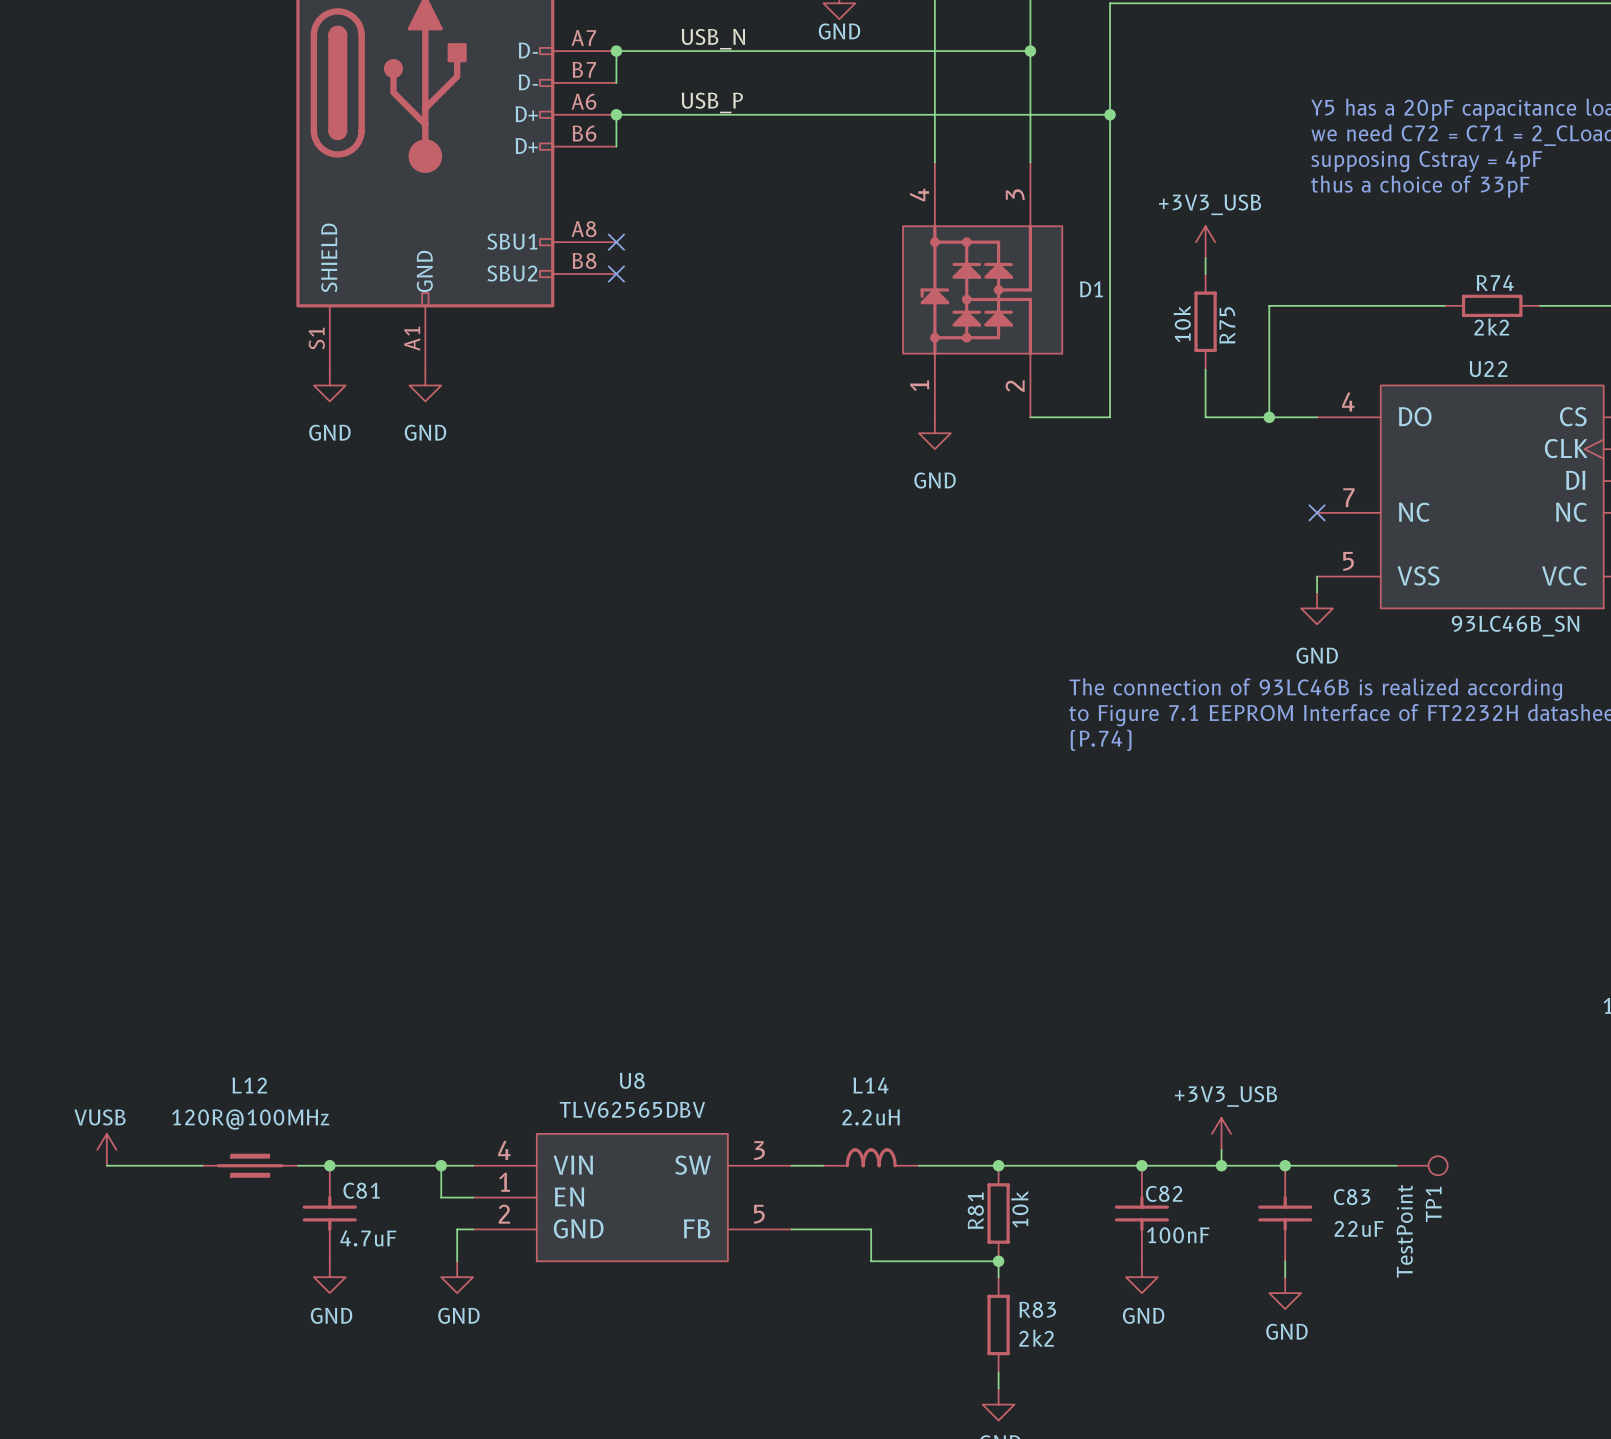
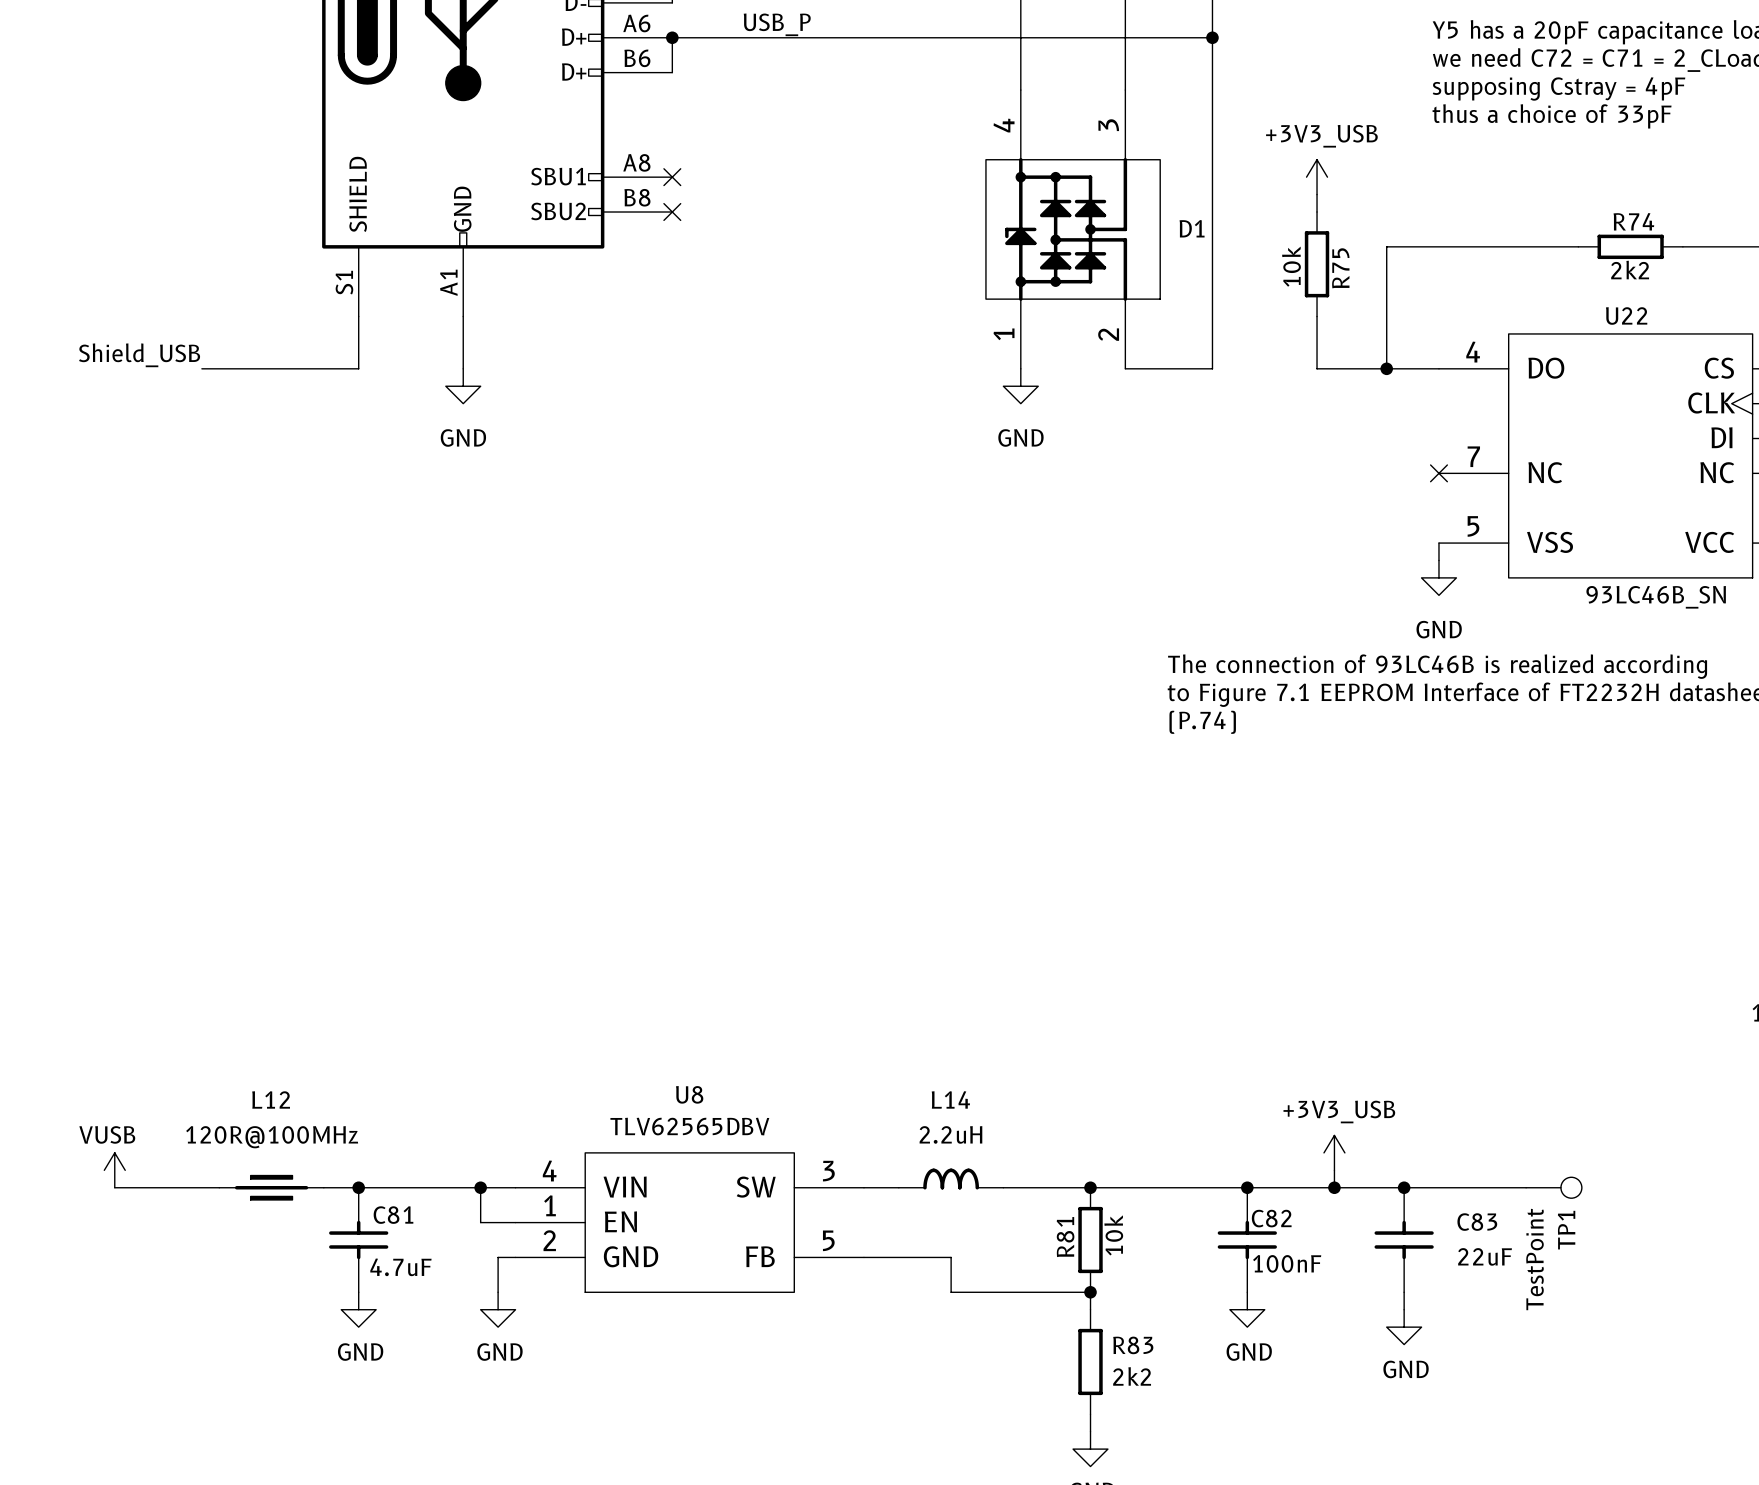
wire: none -> (358, 316) (358, 368) (201, 368)
wire: none -> (463, 316) (463, 368)
power symbol: GND (329, 385) -> none
power symbol position: GND (425, 385) -> GND (463, 386)
label: none -> Shield_USB (139, 355)

